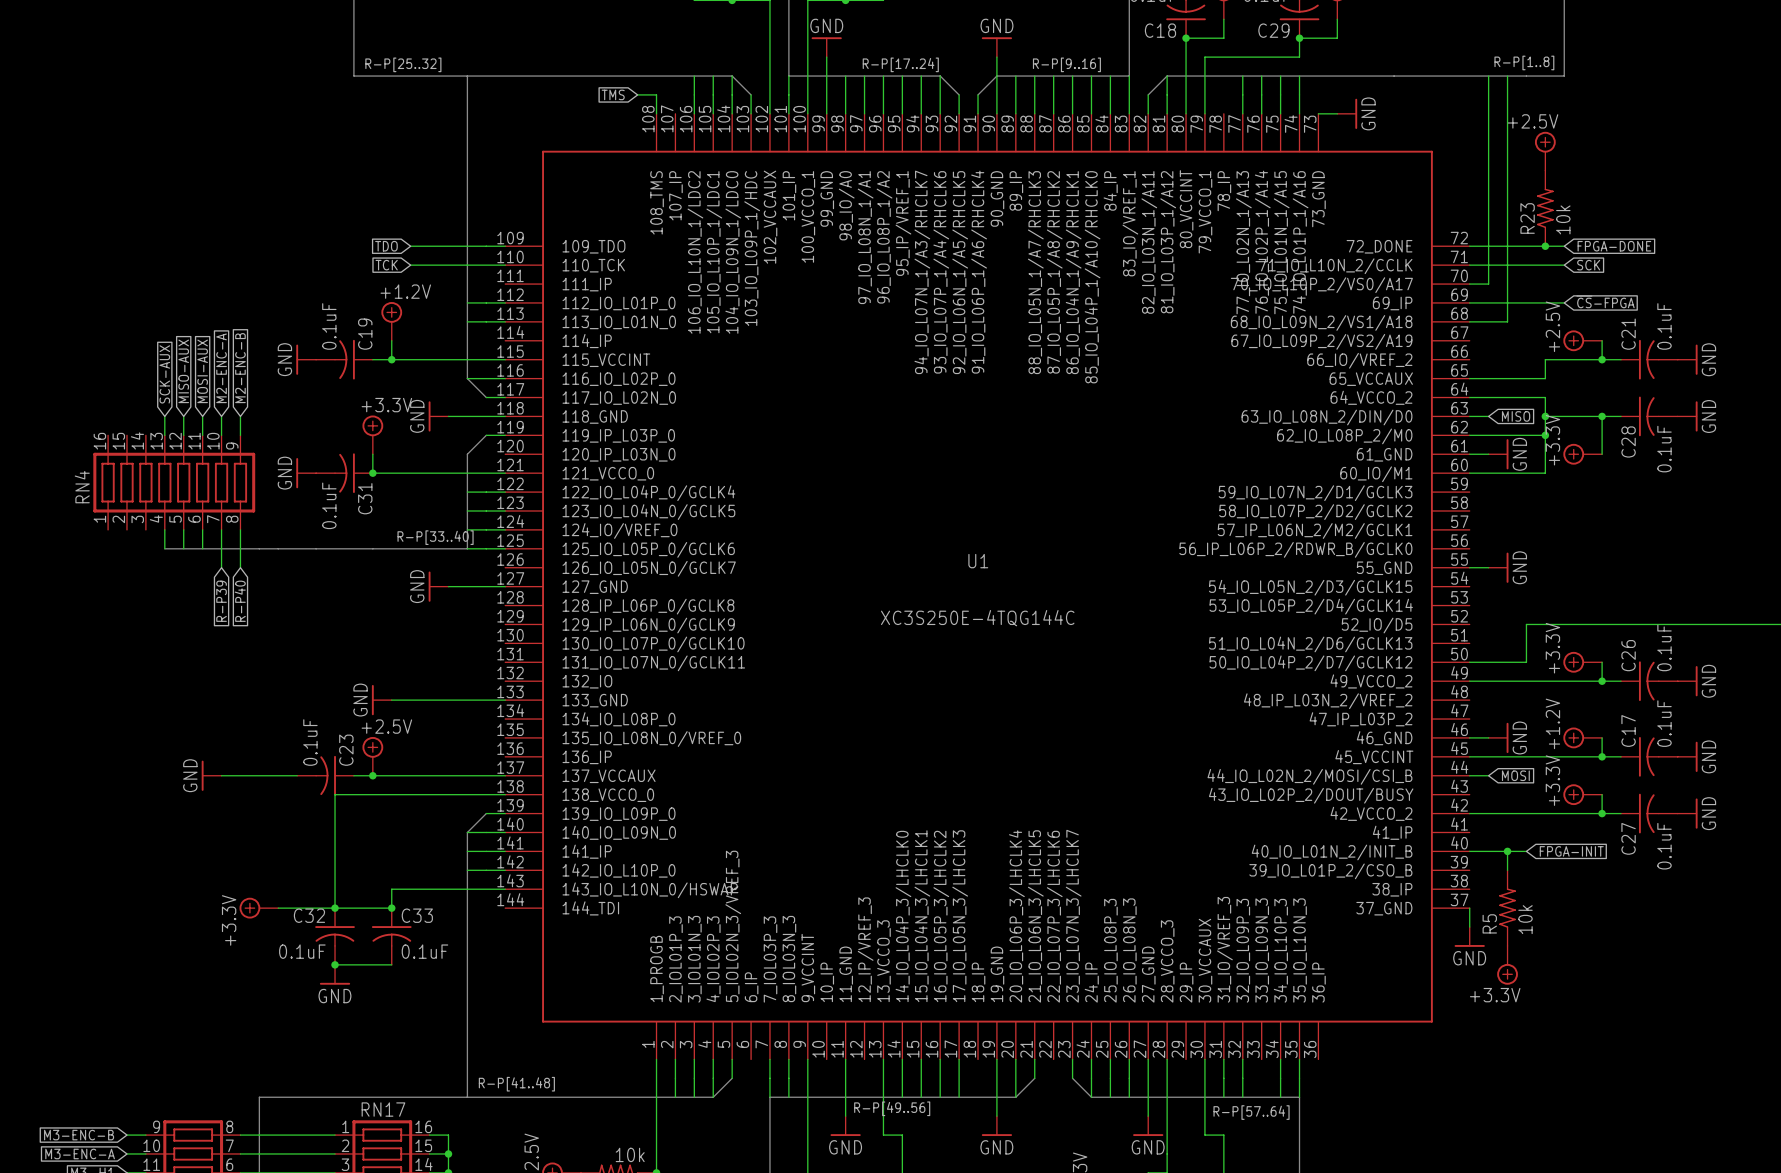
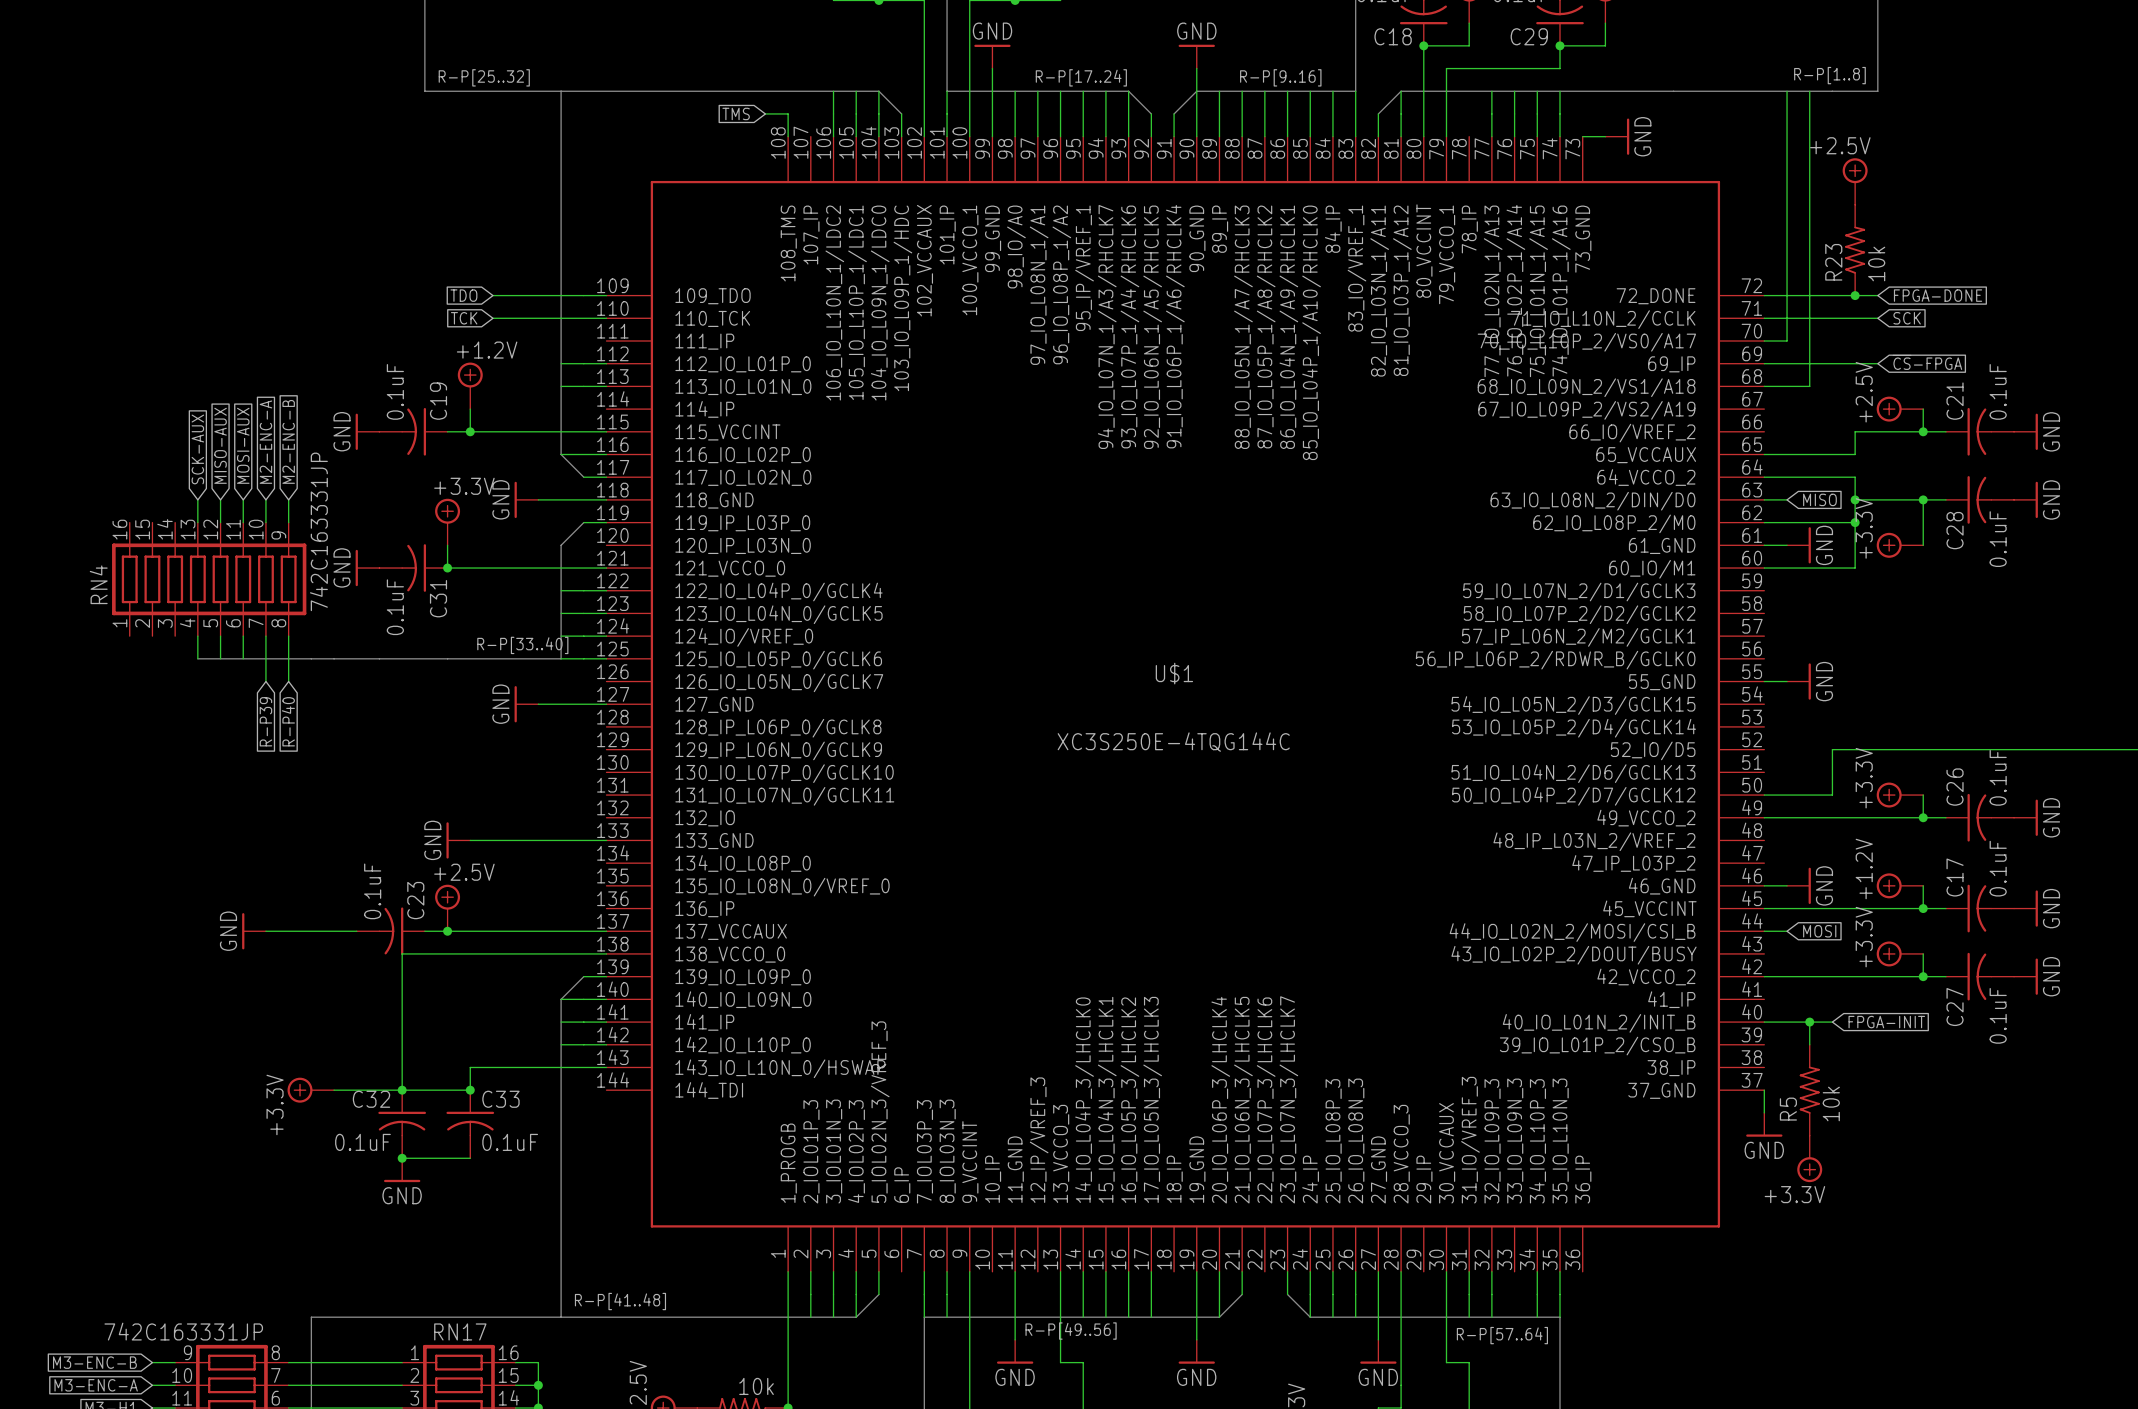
RN4 value: none -> 742C163331JP (318, 531)
U1 name: U1 (978, 561) -> U$1 (1174, 673)
part value: none -> 742C163331JP (183, 1331)

